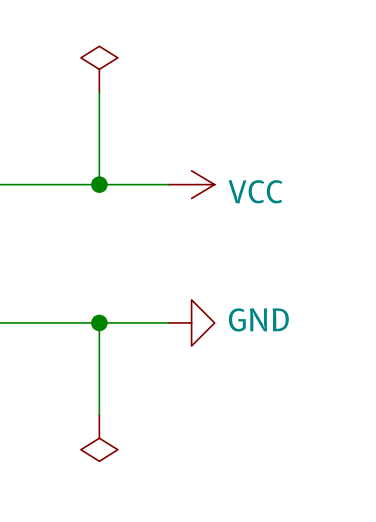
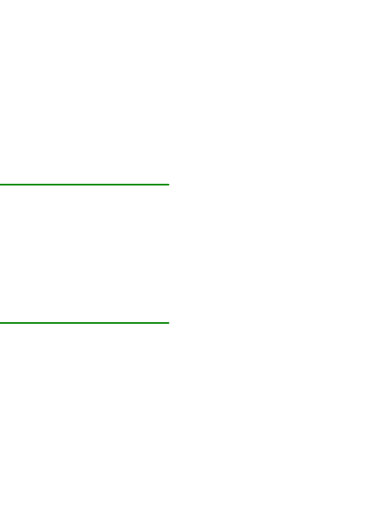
power symbol: (99, 69) -> none
wire: (99, 92) (99, 184) -> none
junction: (99, 184) -> none
power symbol: VCC (191, 184) -> none
wire: (99, 322) (99, 415) -> none
junction: (99, 322) -> none
power symbol: GND (191, 322) -> none
power symbol: (99, 438) -> none

